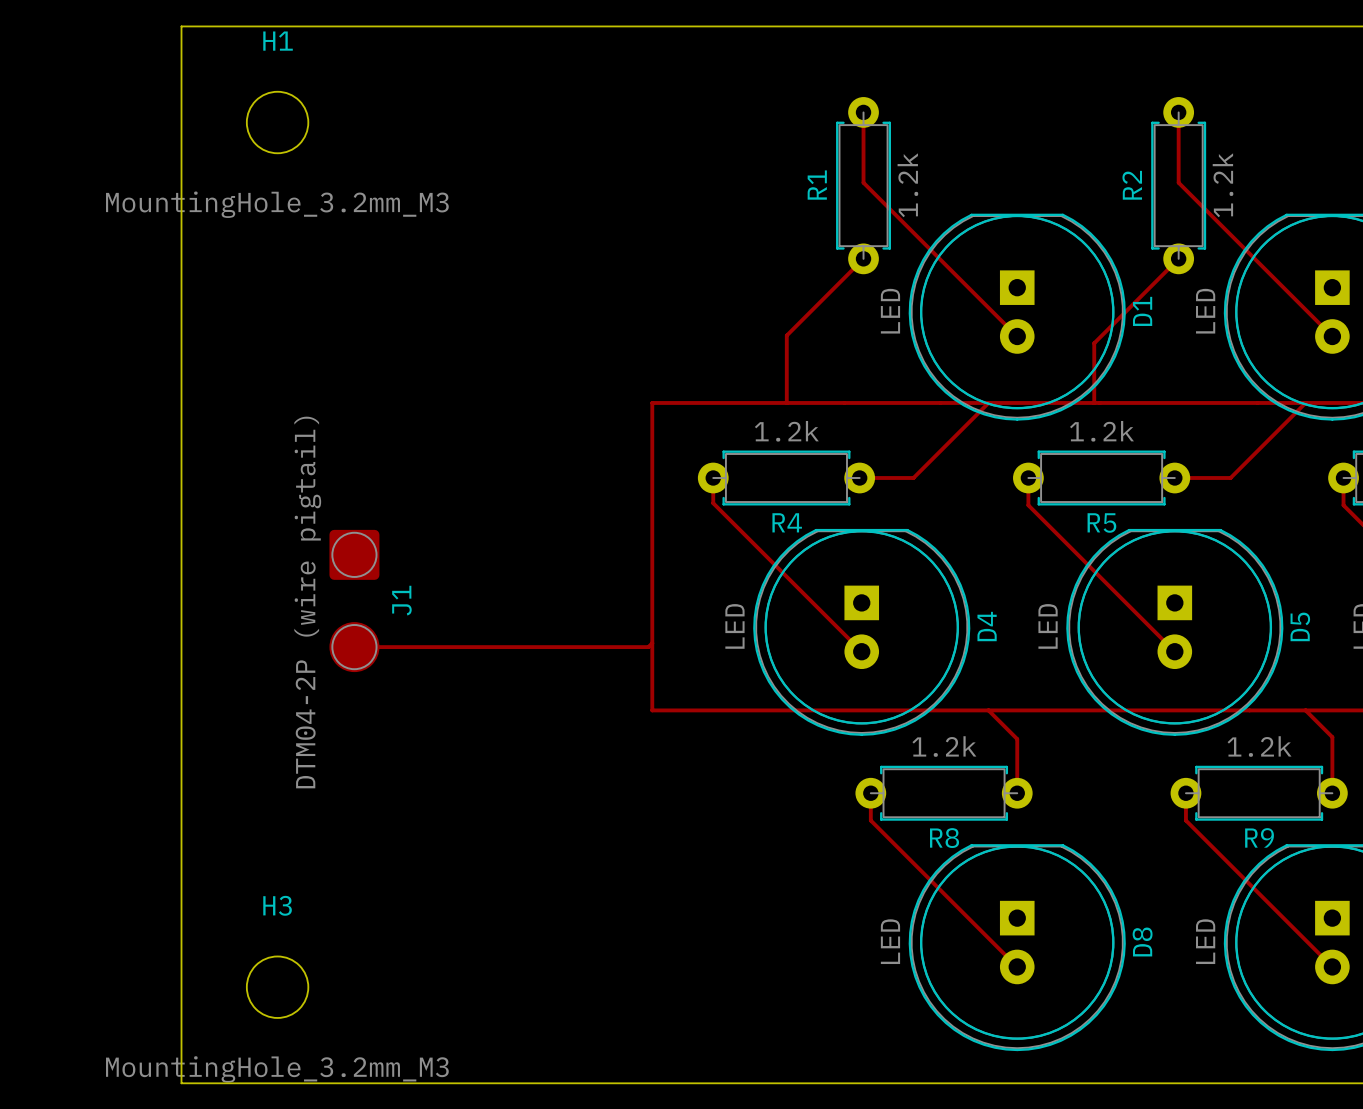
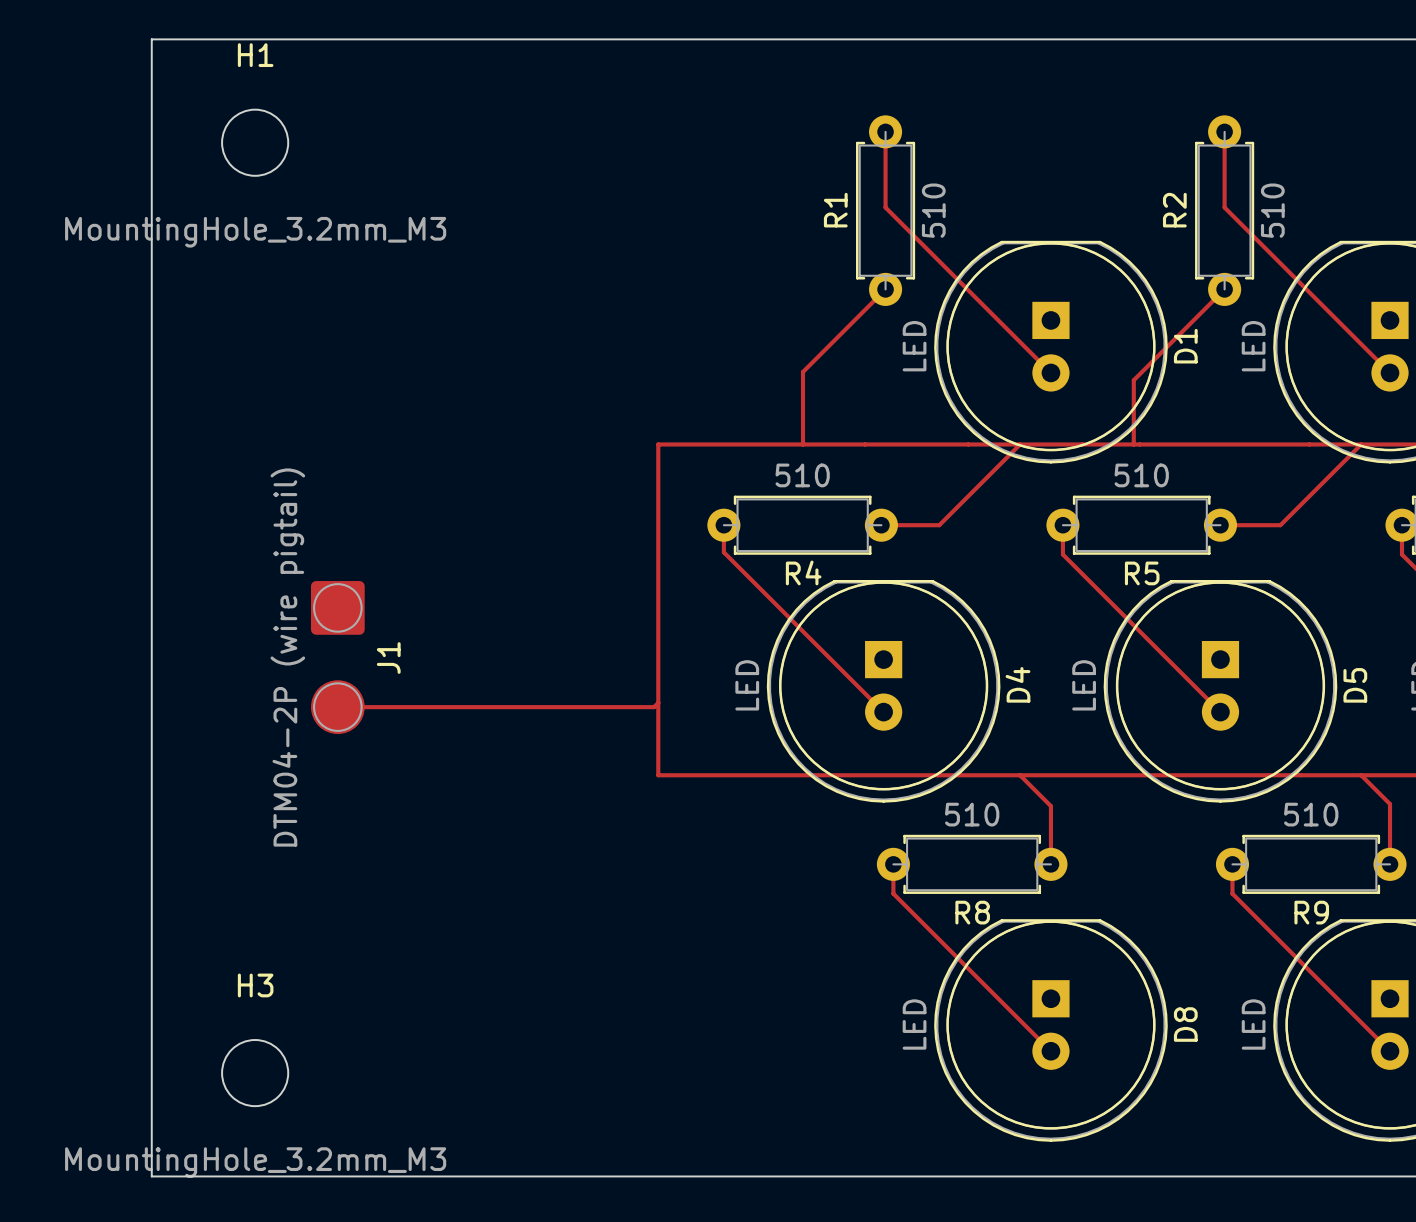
R1 value: 1.2k (907, 185) -> 510 (933, 210)
R2 value: 1.2k (1223, 185) -> 510 (1272, 210)
R4 value: 1.2k (786, 431) -> 510 (802, 475)
R5 value: 1.2k (1101, 431) -> 510 (1141, 475)
R8 value: 1.2k (944, 746) -> 510 (972, 814)
R9 value: 1.2k (1259, 746) -> 510 (1311, 814)

